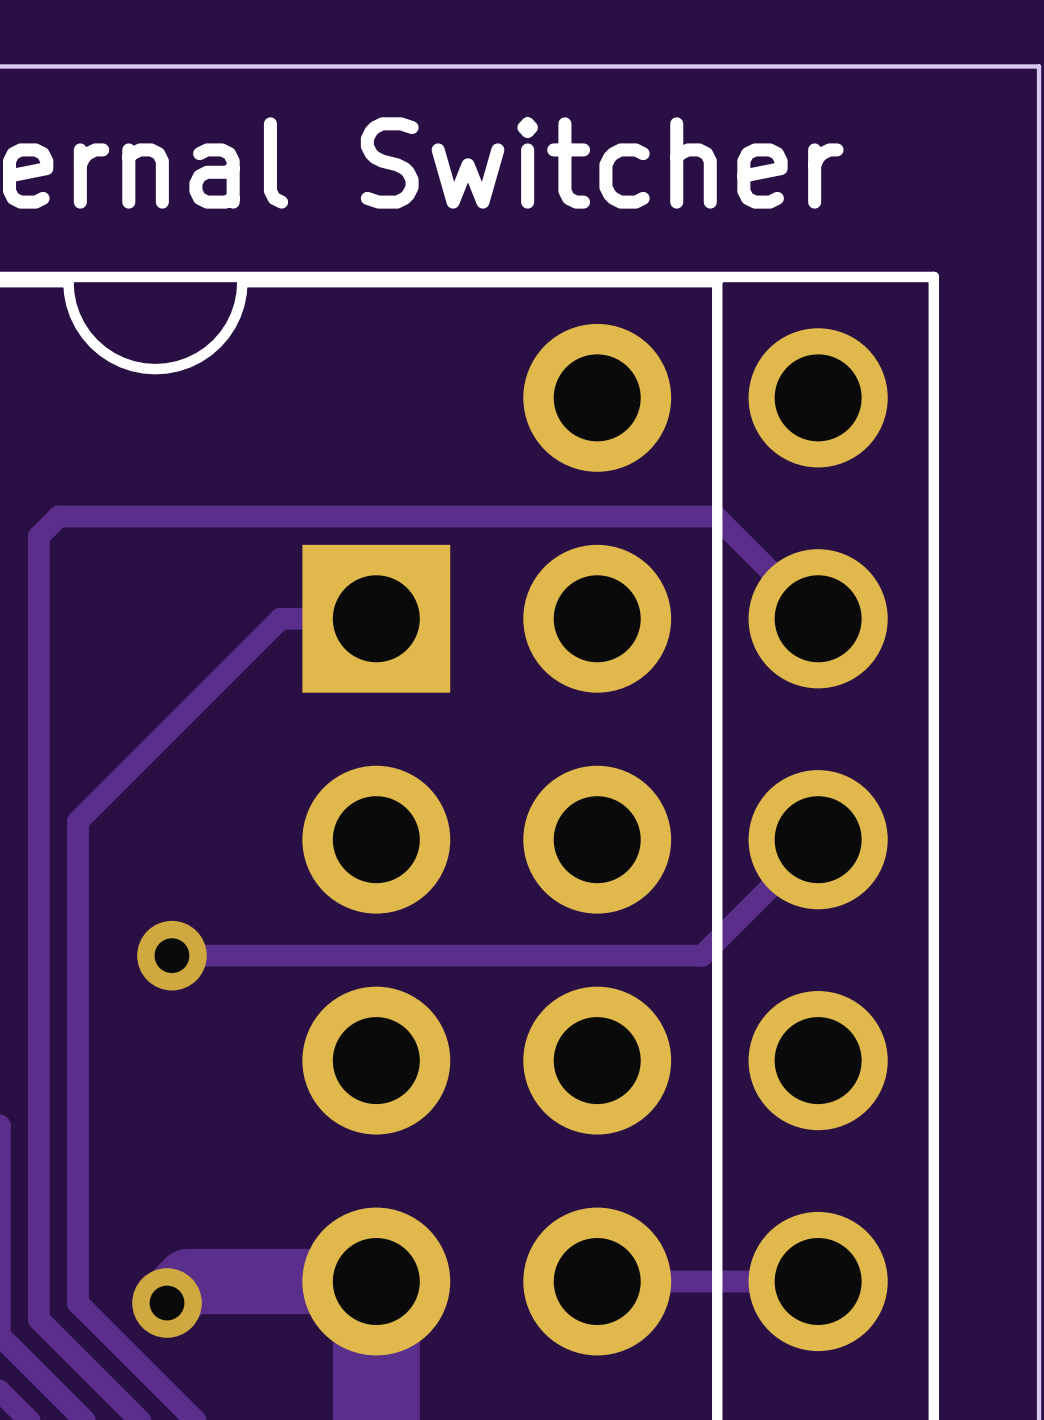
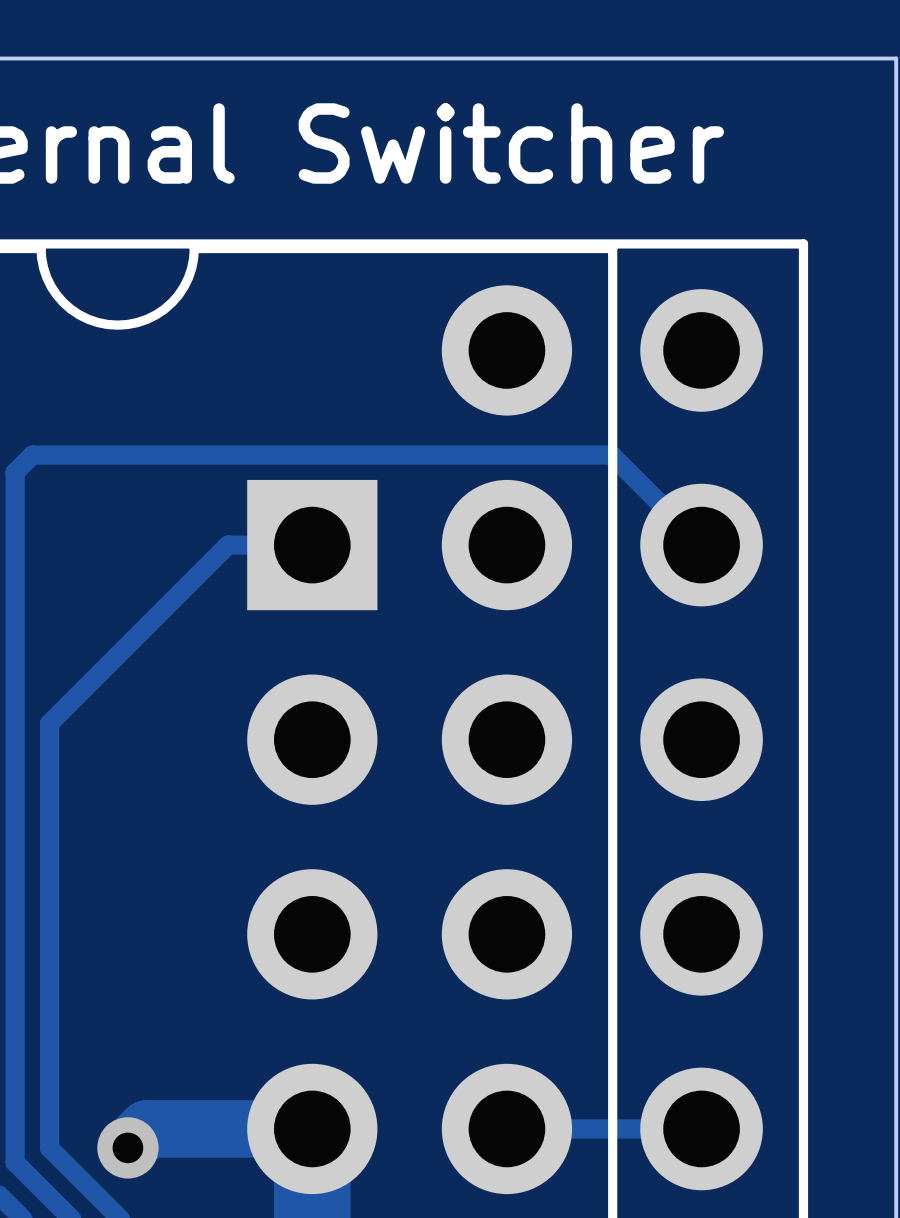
track: (818, 839) (702, 955) (171, 955) -> none
via: (171, 955) -> none

